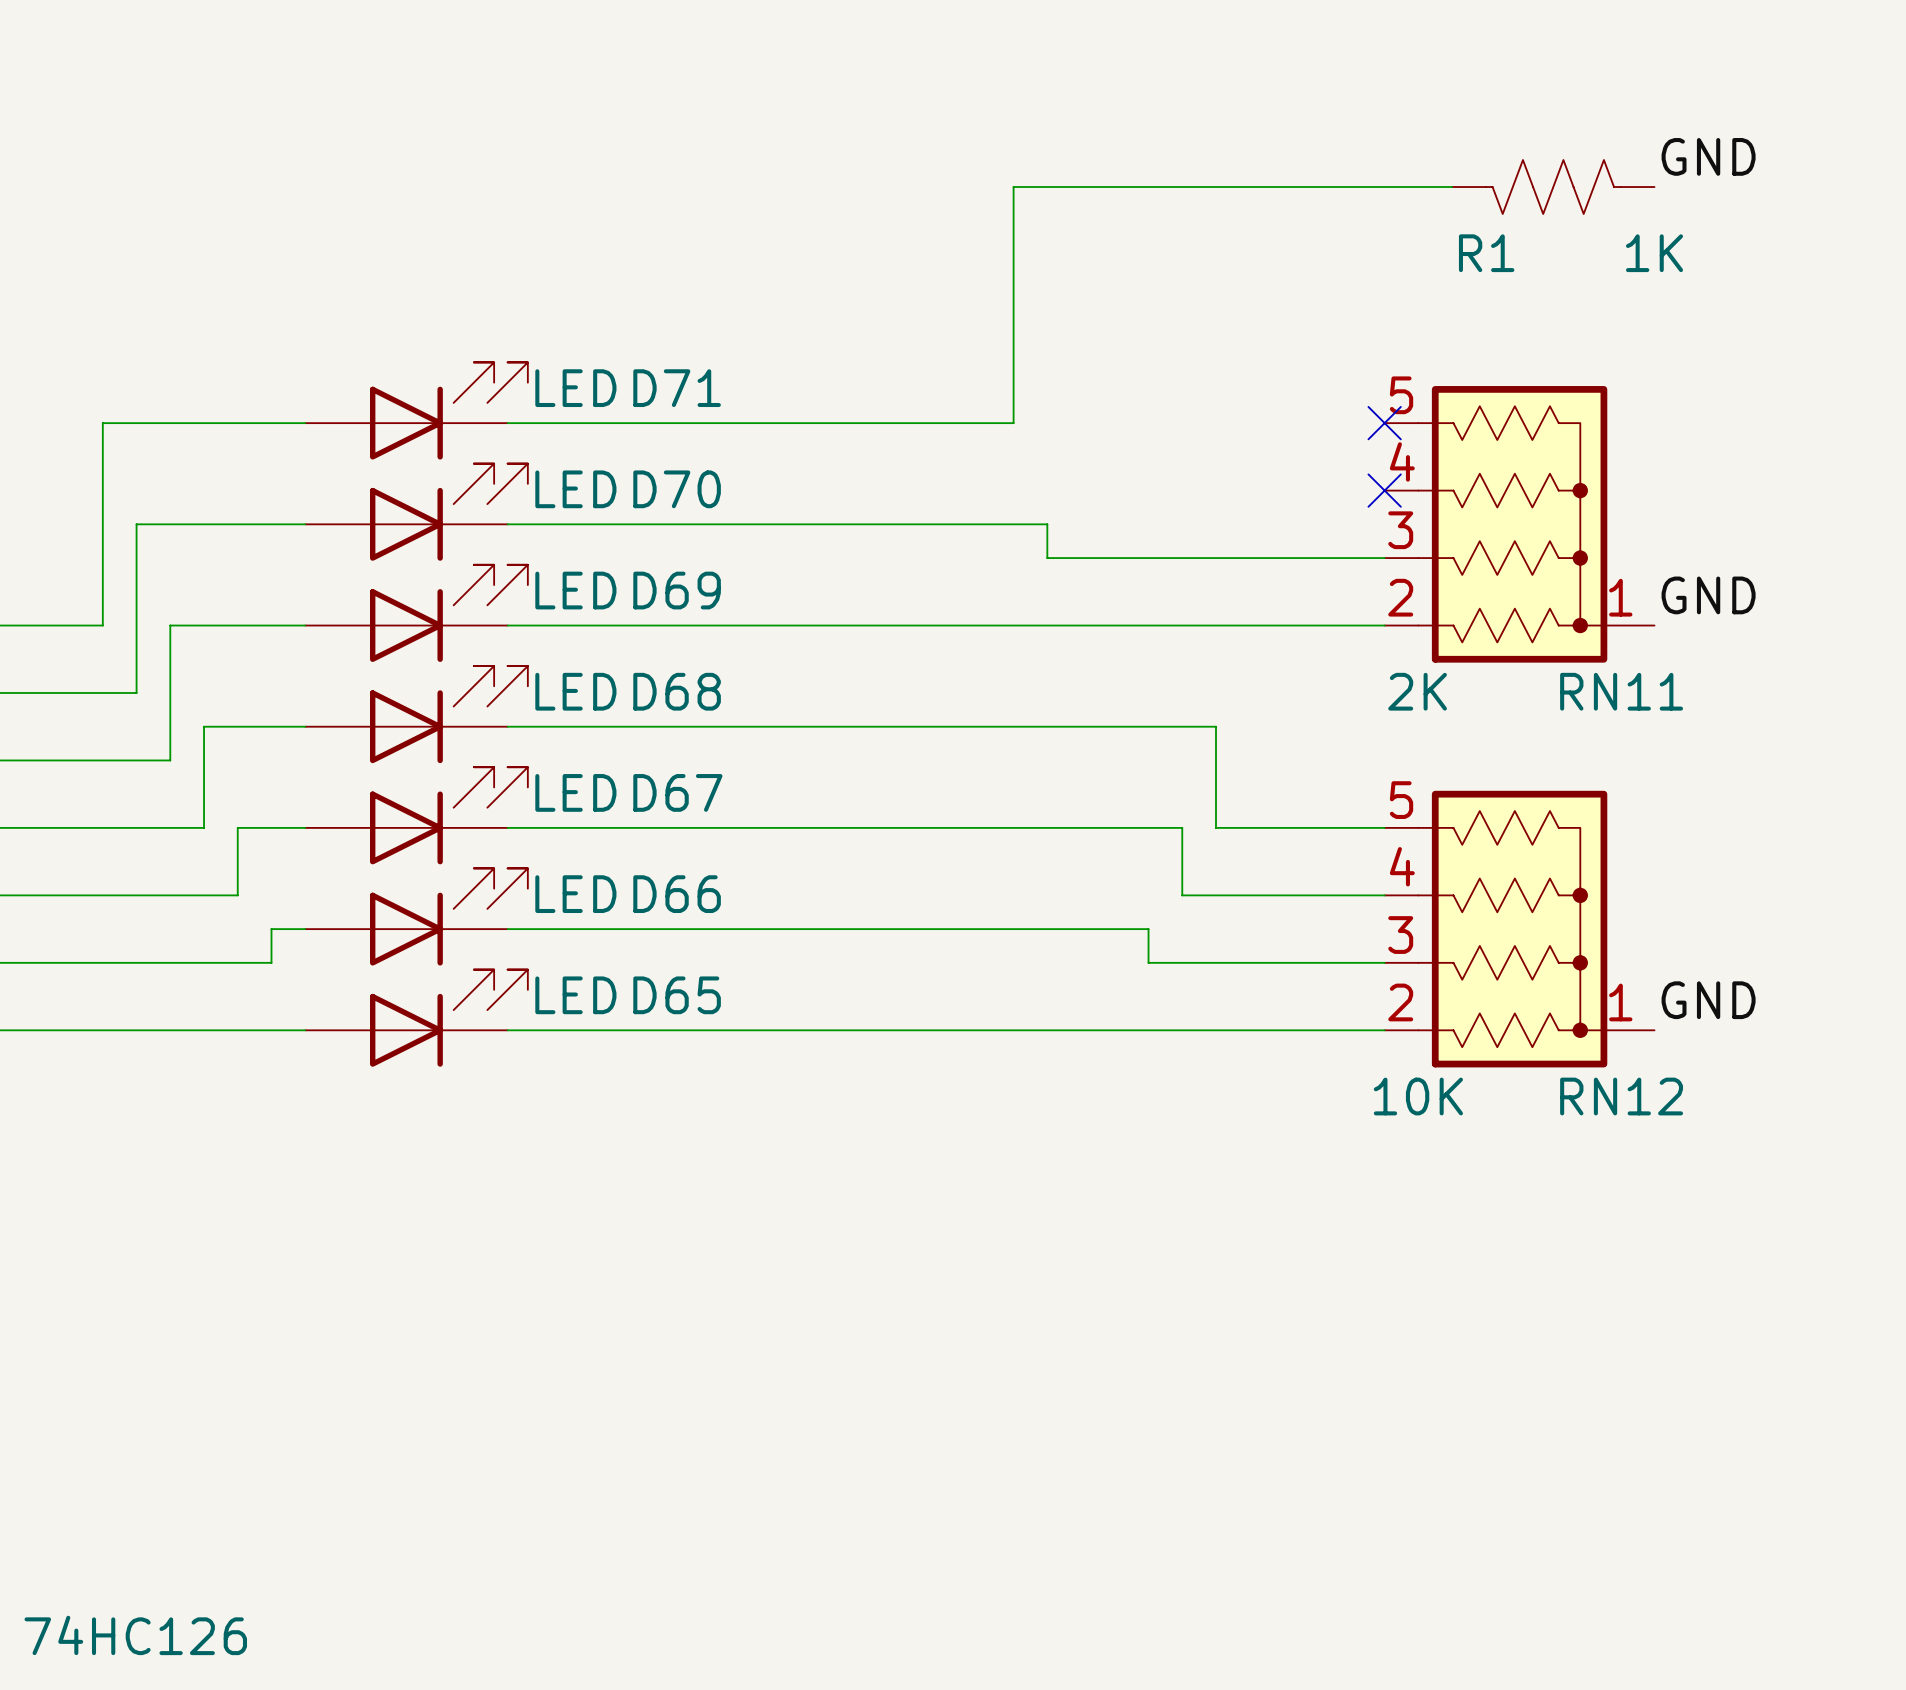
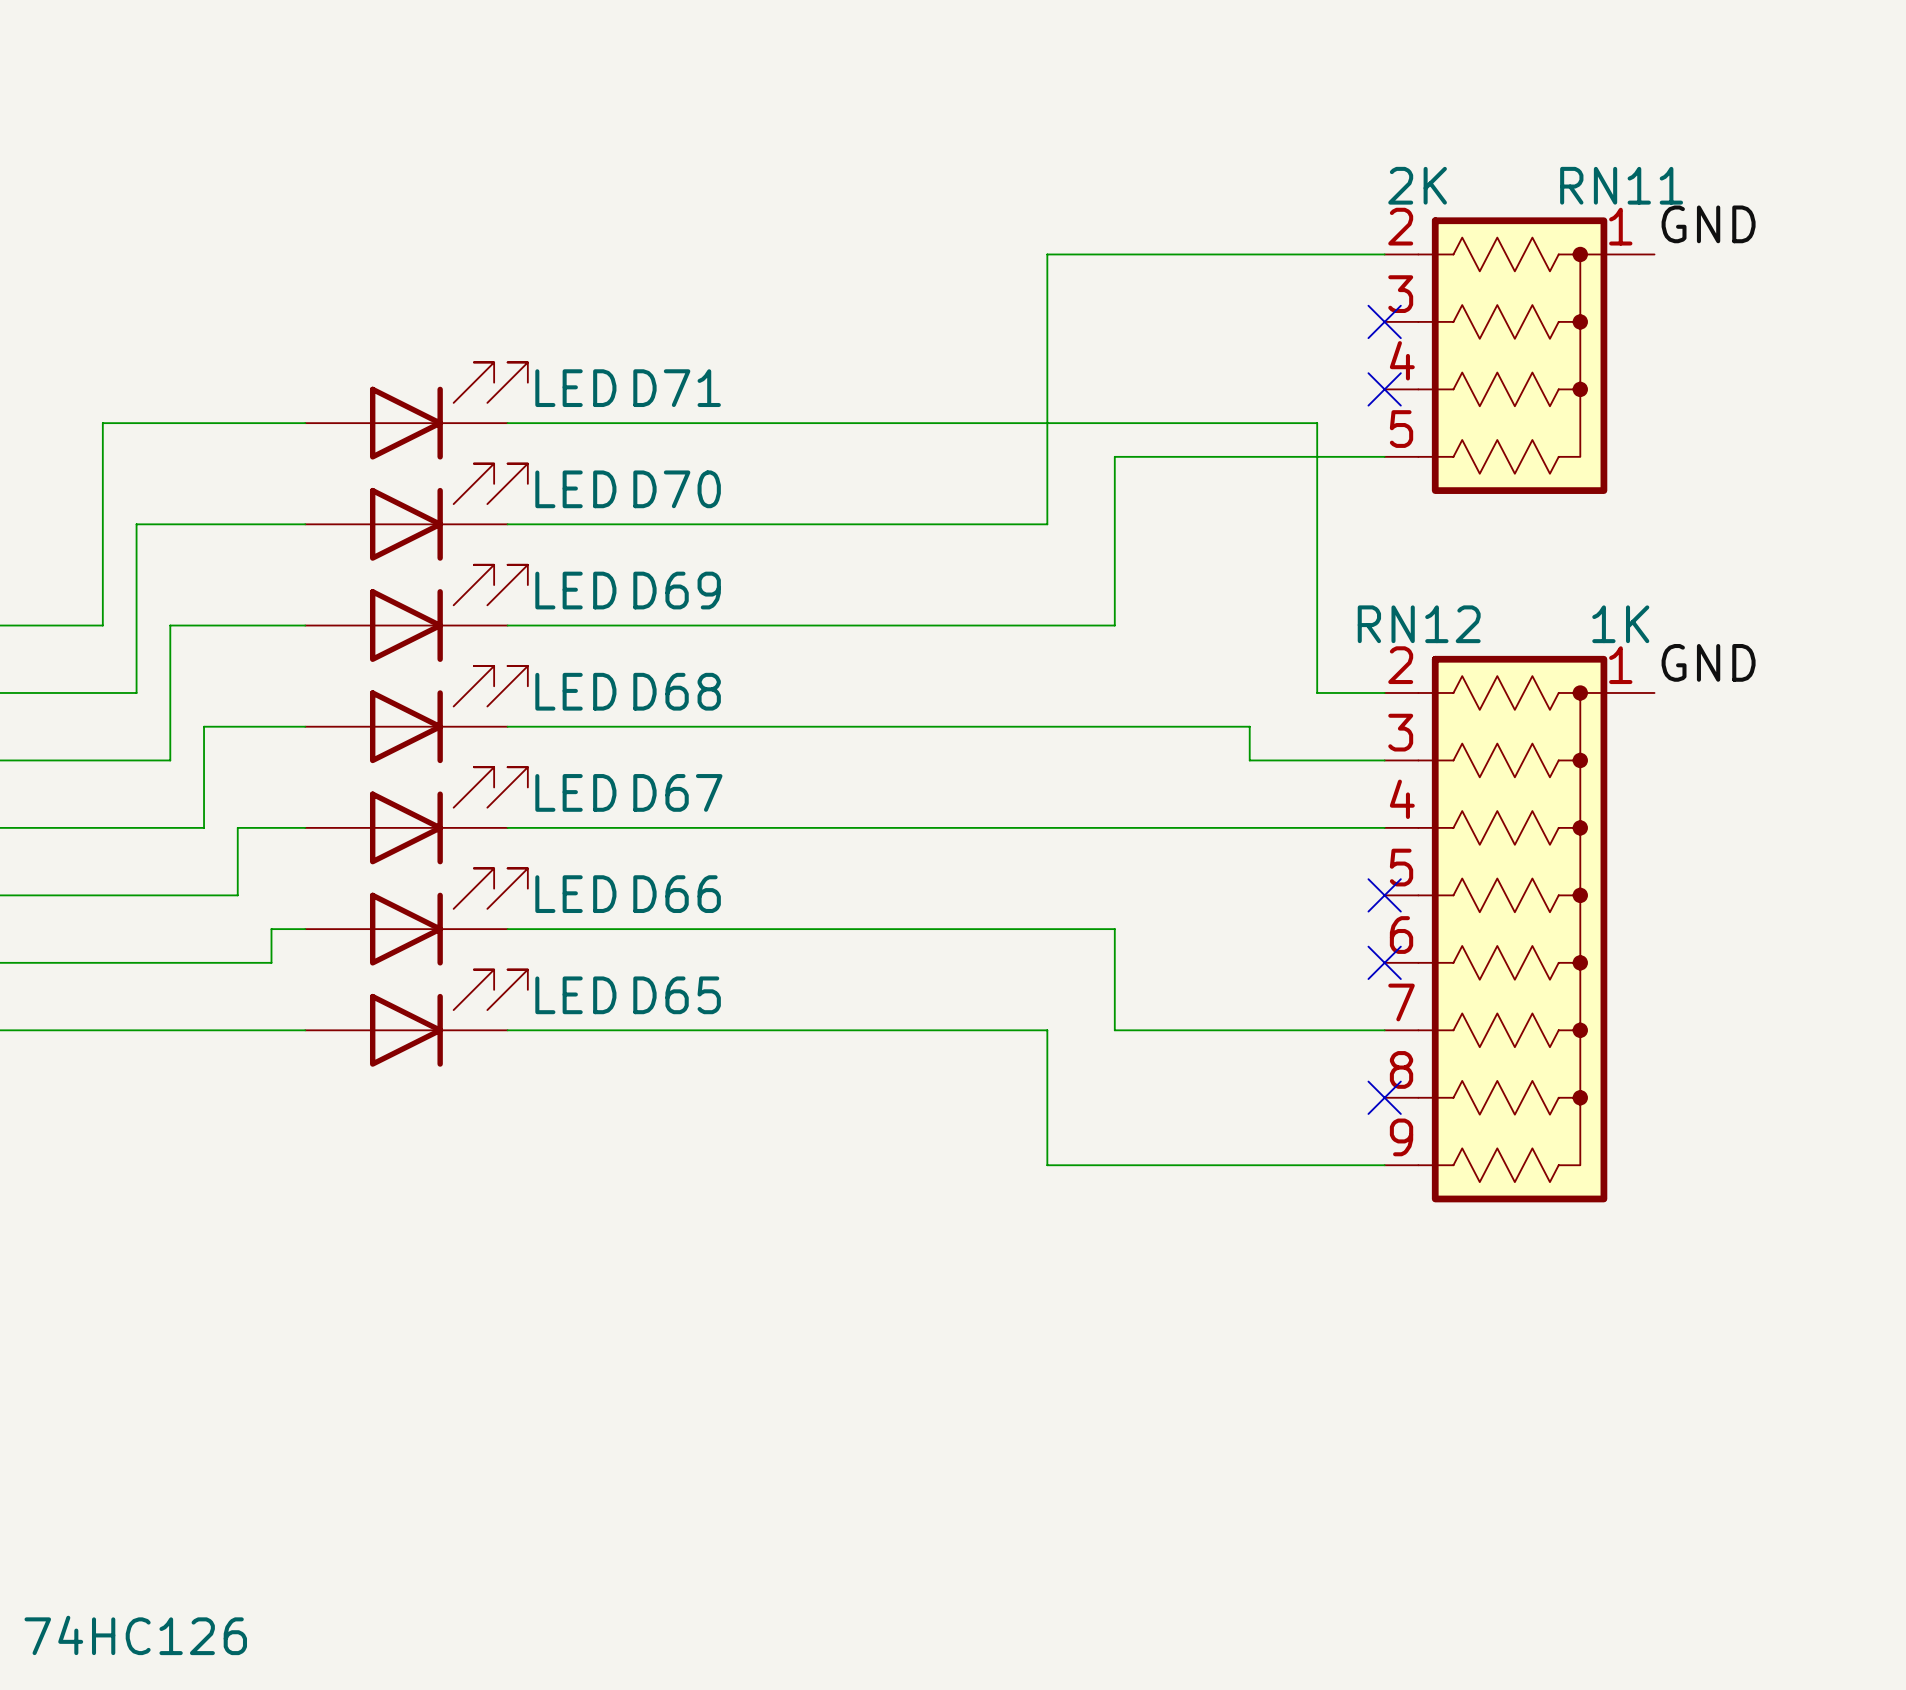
label position: GND (1708, 156) -> GND (1708, 224)
wire: (1452, 187) (1013, 187) (1013, 423) -> (1384, 692) (1317, 692) (1317, 423) (1013, 423)
R1: 1K (1553, 187) -> none
no-connect mark: none -> (1384, 321)
no-connect mark position: (1384, 423) -> (1384, 389)
no-connect mark: (1384, 490) -> none
wire: (1047, 524) (1047, 558) (1384, 558) -> (1047, 524) (1047, 254) (1384, 254)
RN11 flip: as is (1512, 524) -> up-down (1512, 355)
RN11 position: (1519, 524) -> (1519, 355)
label position: GND (1708, 595) -> GND (1708, 662)
wire: (1114, 625) (1384, 625) -> (1114, 625) (1114, 456) (1384, 456)
wire: (1215, 726) (1215, 827) -> (1182, 827) (1215, 827)
wire: none -> (1215, 726) (1249, 726) (1249, 760) (1384, 760)
RN12 symbol: [1384, 790, 1655, 1068] -> [1384, 655, 1655, 1203]
wire: (1182, 827) (1182, 895) (1384, 895) -> none
no-connect mark: none -> (1384, 895)
wire: (1114, 929) (1148, 929) (1148, 962) (1384, 962) -> none
no-connect mark: none -> (1384, 962)
label: GND (1708, 1000) -> none
wire: (1047, 1030) (1114, 1030) -> (1114, 929) (1114, 1030)
wire: none -> (1047, 1030) (1047, 1165) (1384, 1165)
RN12 value: 10K (1418, 1096) -> 1K (1620, 624)
RN12 name position: RN12 (1621, 1096) -> RN12 (1419, 624)
no-connect mark: none -> (1384, 1097)

